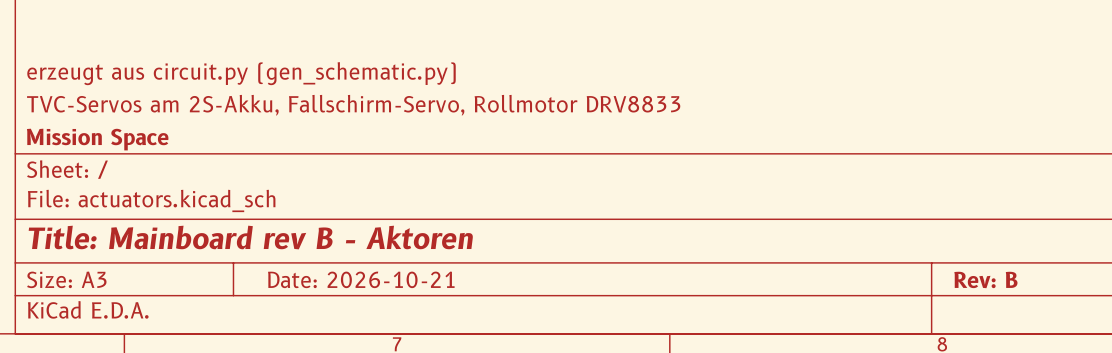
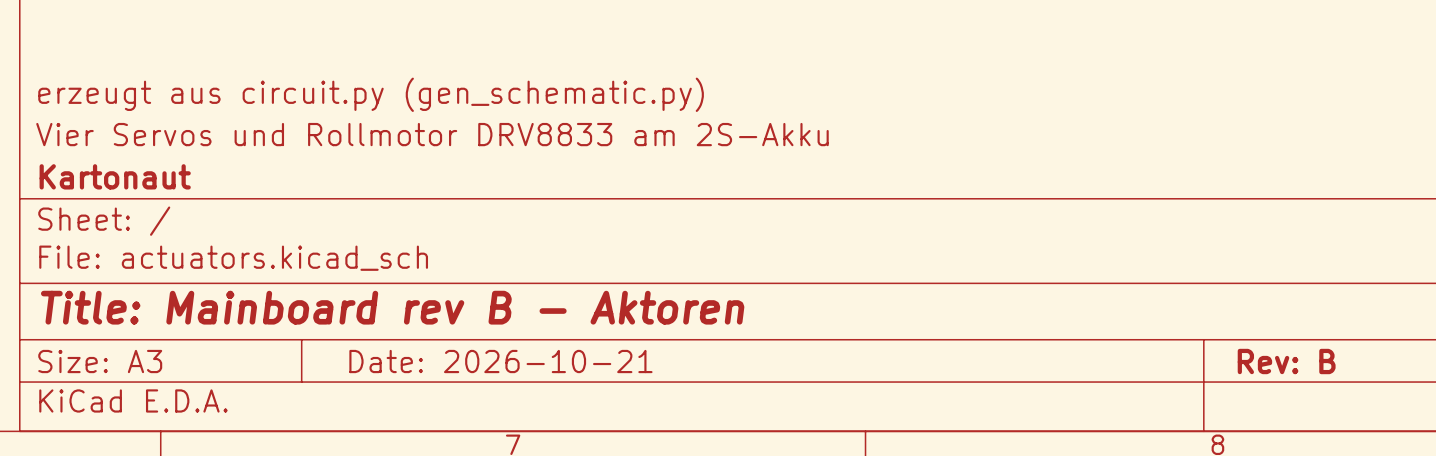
title block: TVC-Servos am 2S-Akku, Fallschirm-Servo, Rollmotor DRV8833 (353, 105) -> Vier Servos und Rollmotor DRV8833 am 2S-Akku (432, 134)
title block: Mission Space (97, 139) -> Kartonaut (115, 176)

